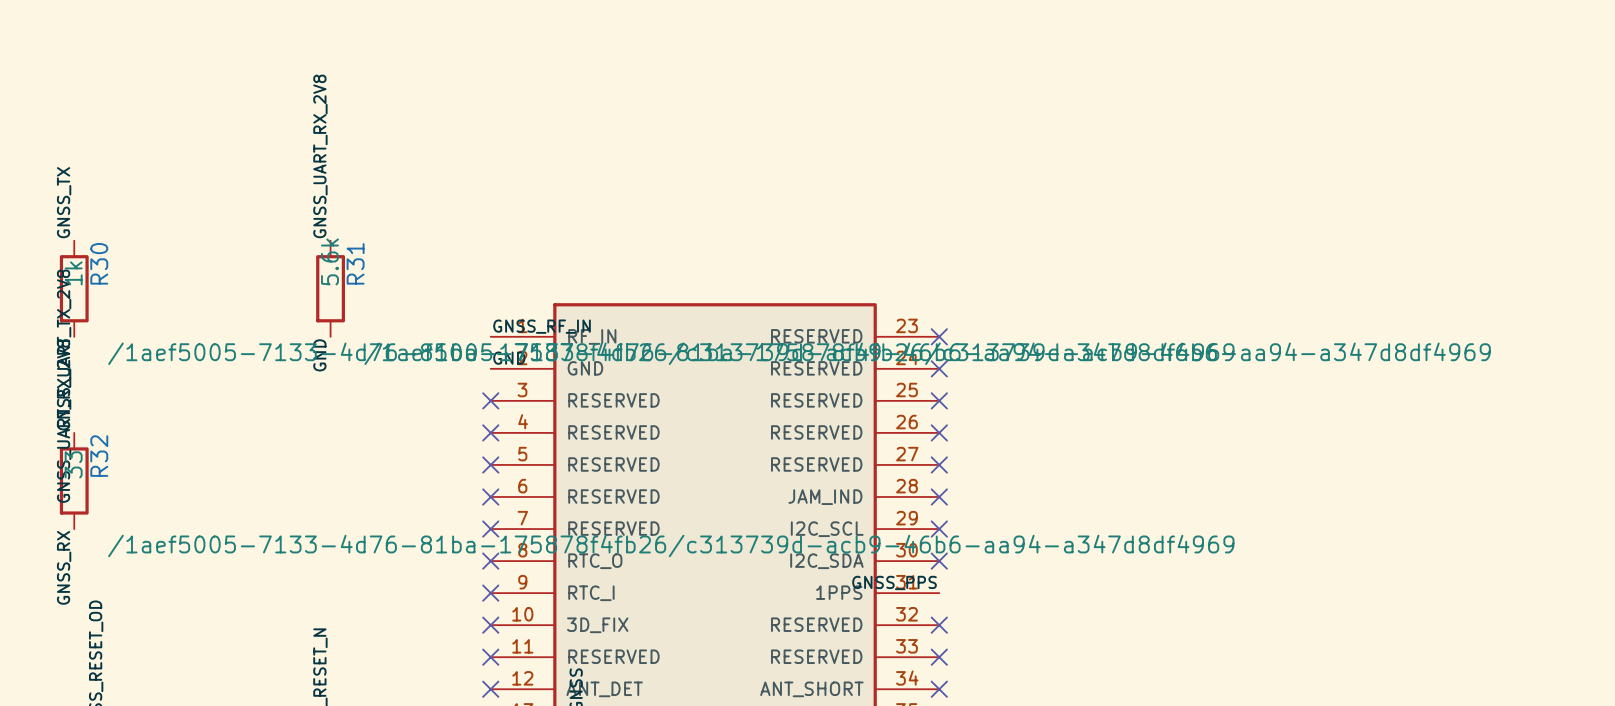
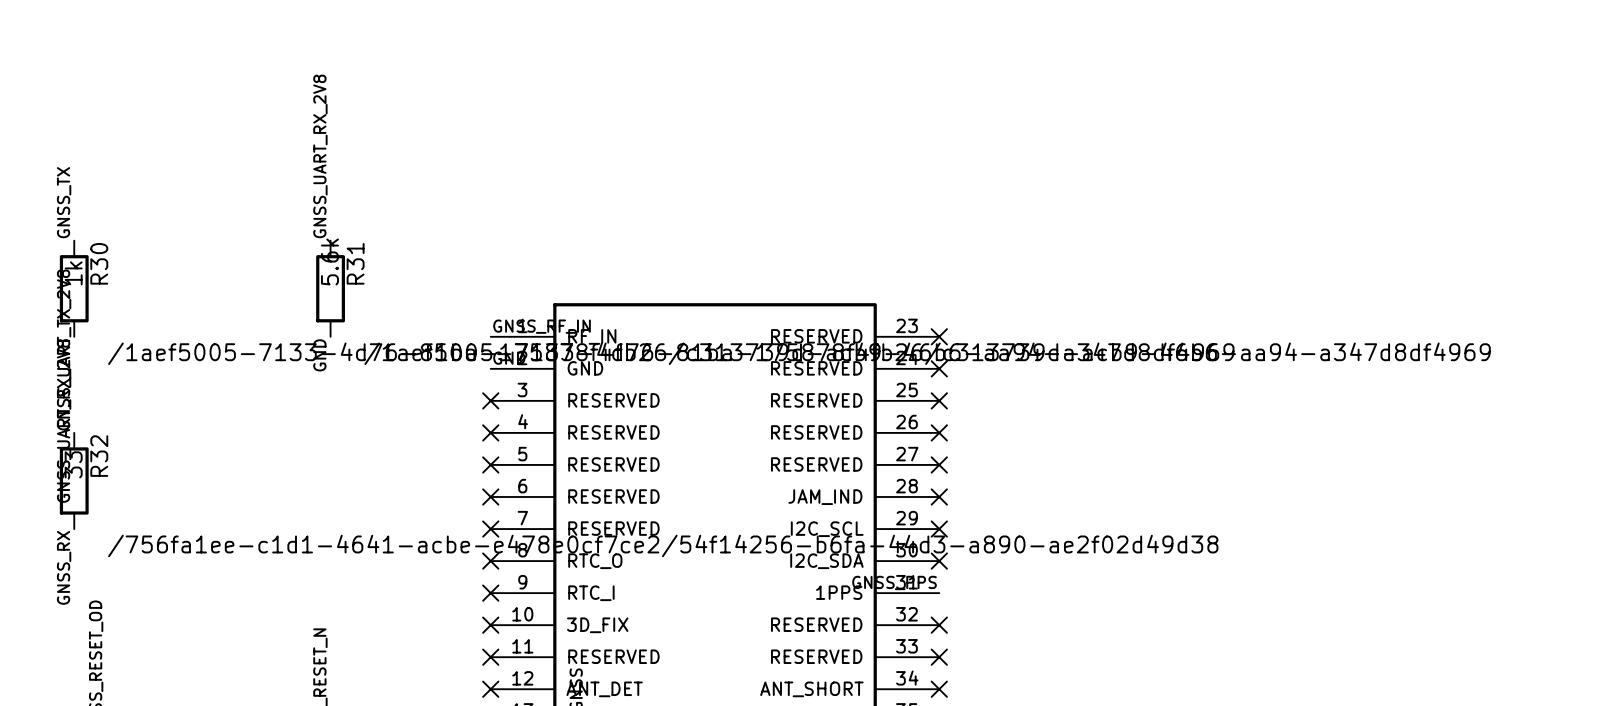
R32 text: /1aef5005-7133-4d76-81ba-175878f4fb26/c313739d-acb9-46b6-aa94-a347d8df4969 (671, 545) -> /756fa1ee-c1d1-4641-acbe-e478e0cf7ce2/54f14256-b6fa-44d3-a890-ae2f02d49d38 (663, 545)

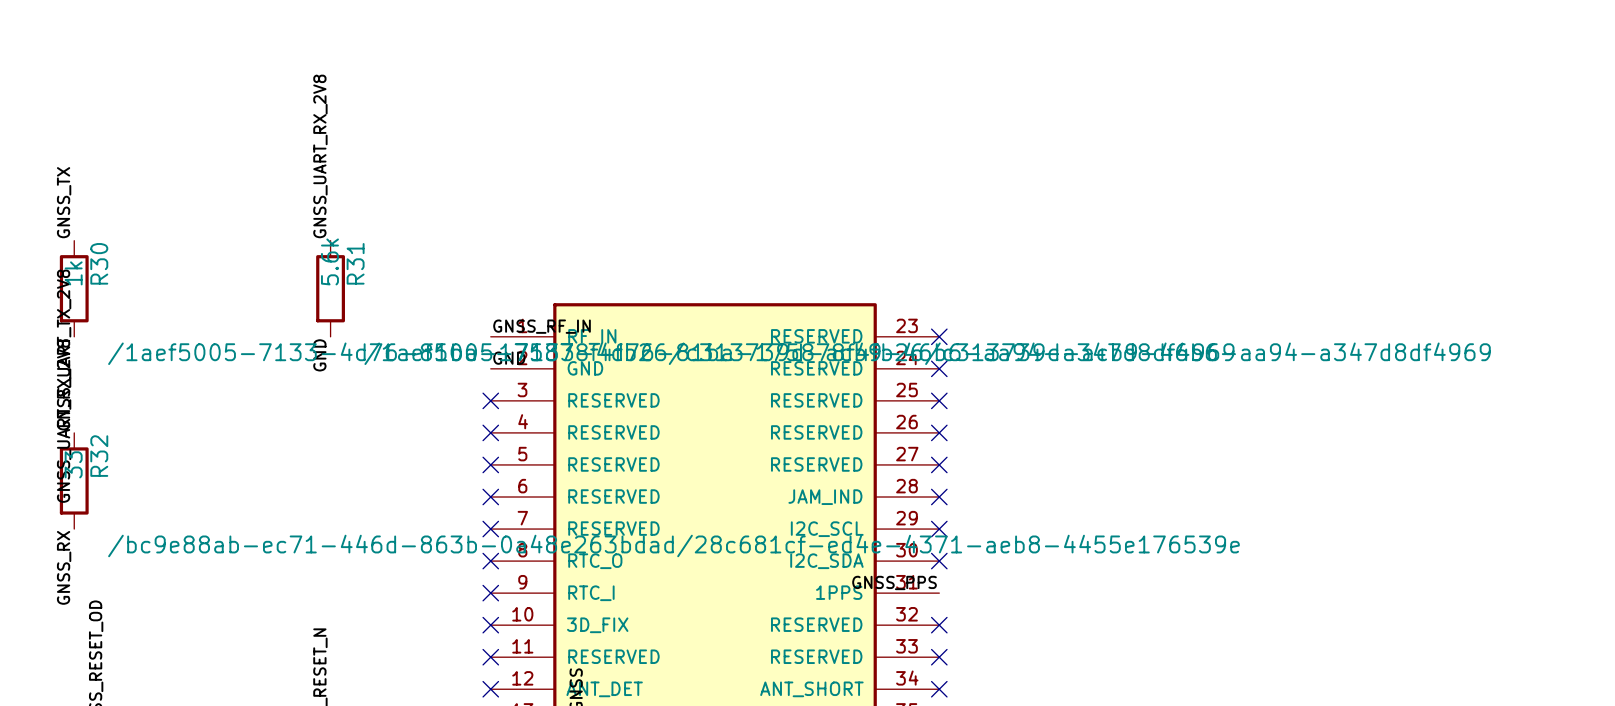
R32 text: /756fa1ee-c1d1-4641-acbe-e478e0cf7ce2/54f14256-b6fa-44d3-a890-ae2f02d49d38 (663, 545) -> /bc9e88ab-ec71-446d-863b-0a48e263bdad/28c681cf-ed4e-4371-aeb8-4455e176539e (673, 545)

